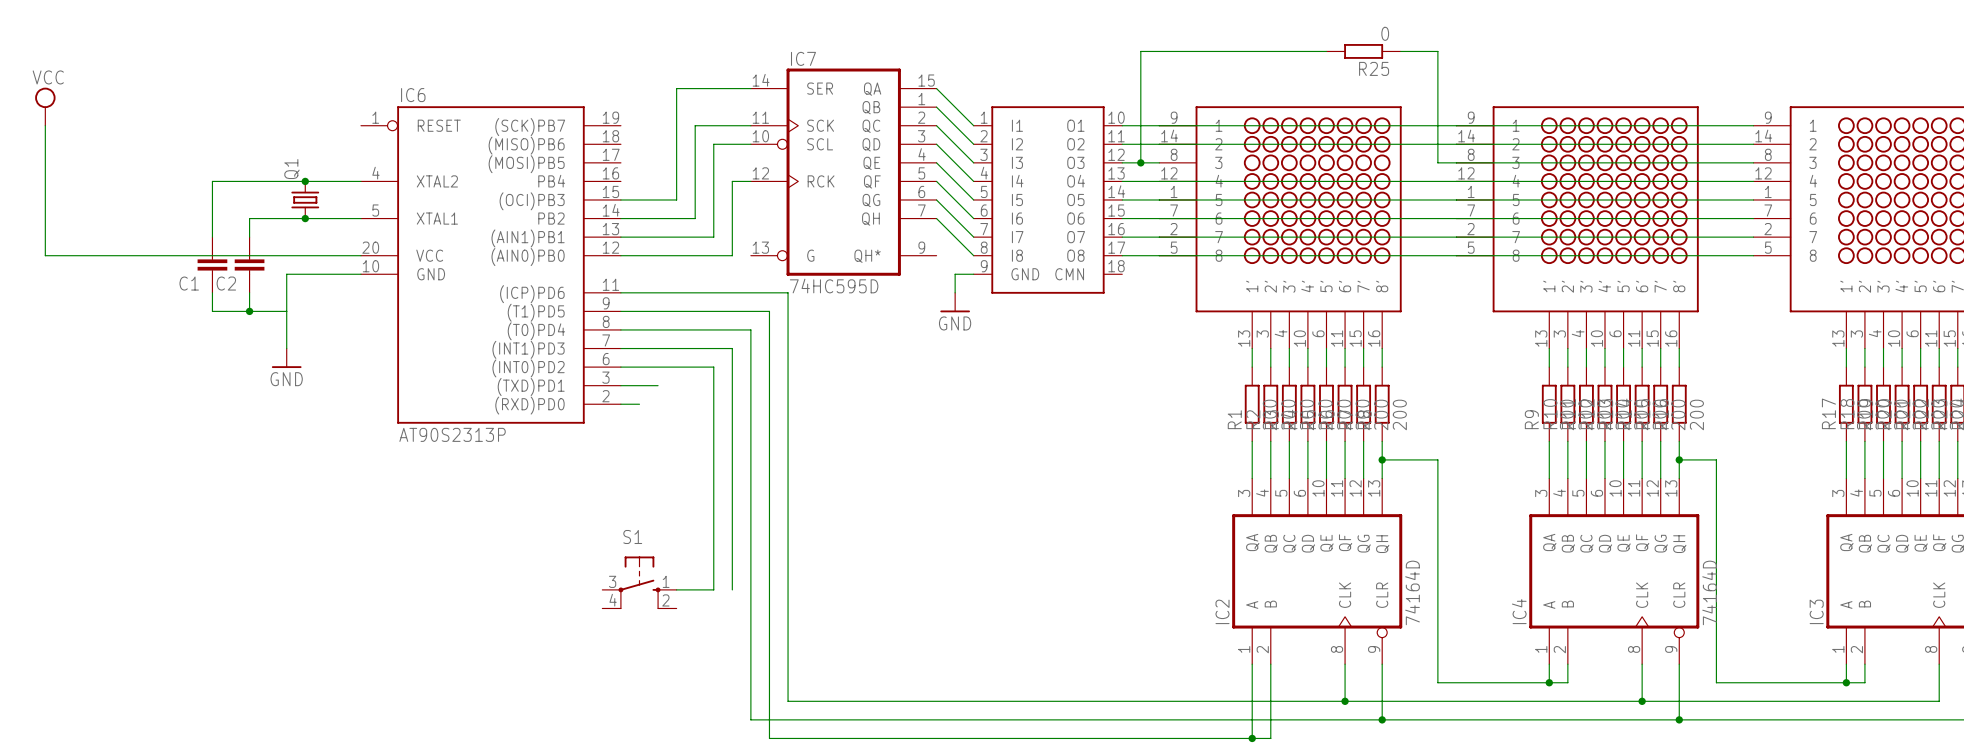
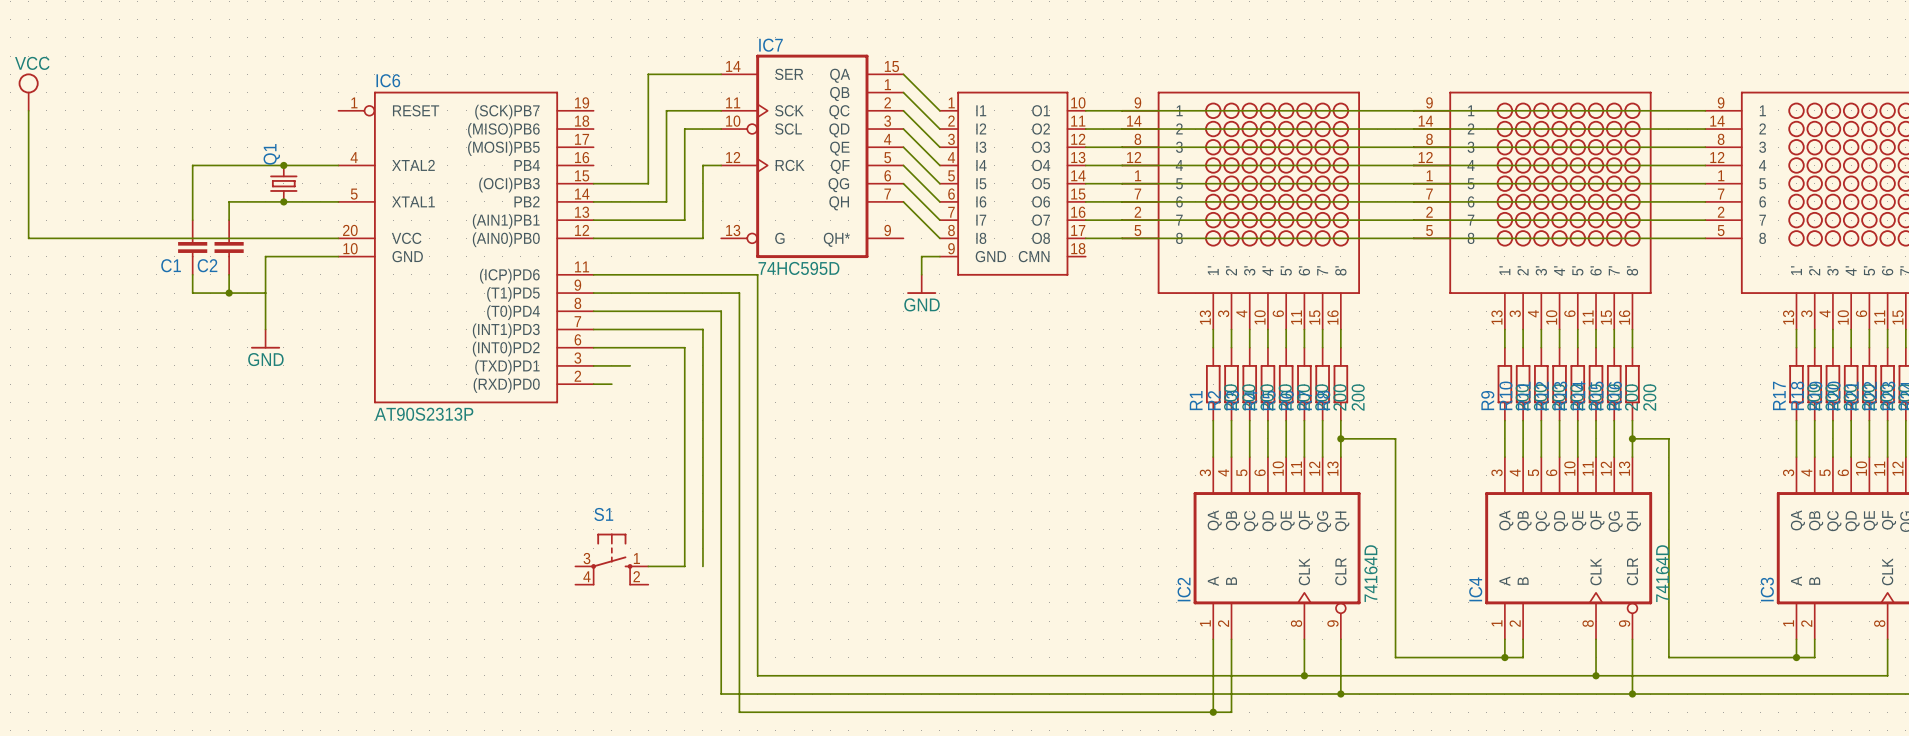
wire: (1326, 51) (1140, 51) (1140, 162) -> none
R25: 0 (1363, 51) -> none
wire: (1400, 51) (1437, 51) (1437, 162) -> (1122, 147) (1395, 147)
junction: (1140, 162) -> none

